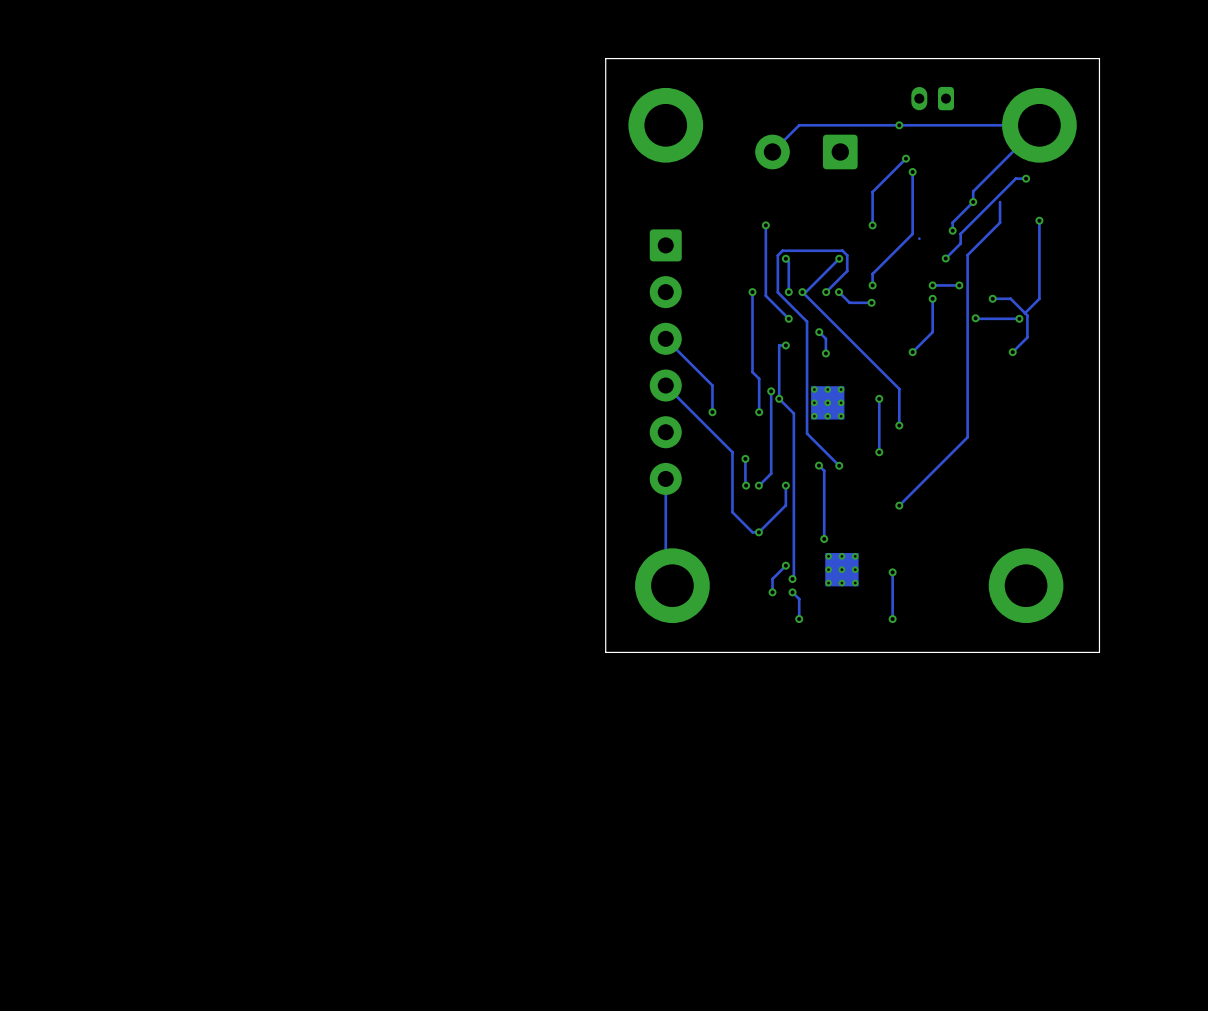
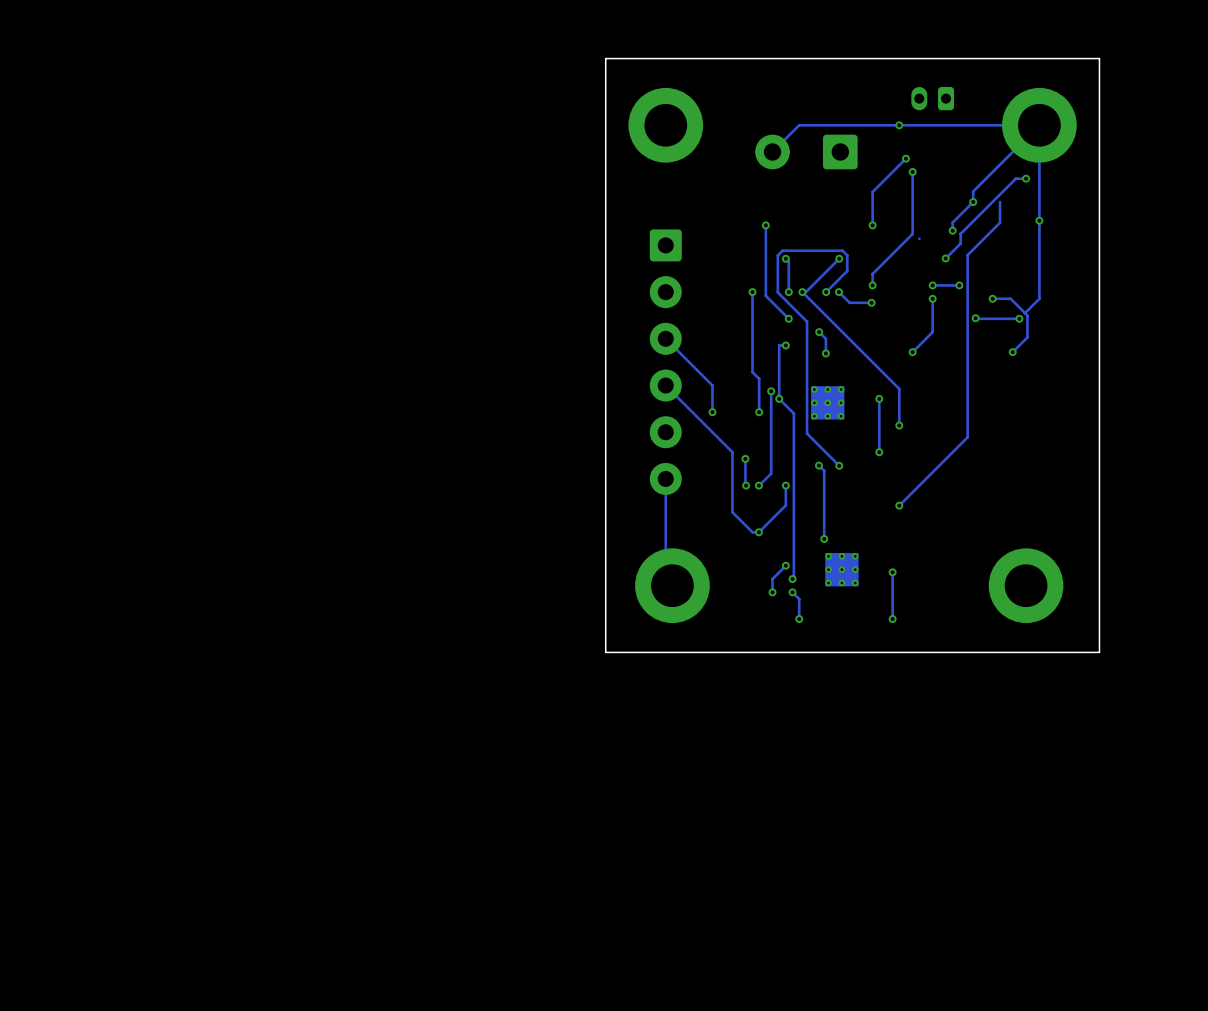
track: none -> (1039, 125) (1039, 220)

